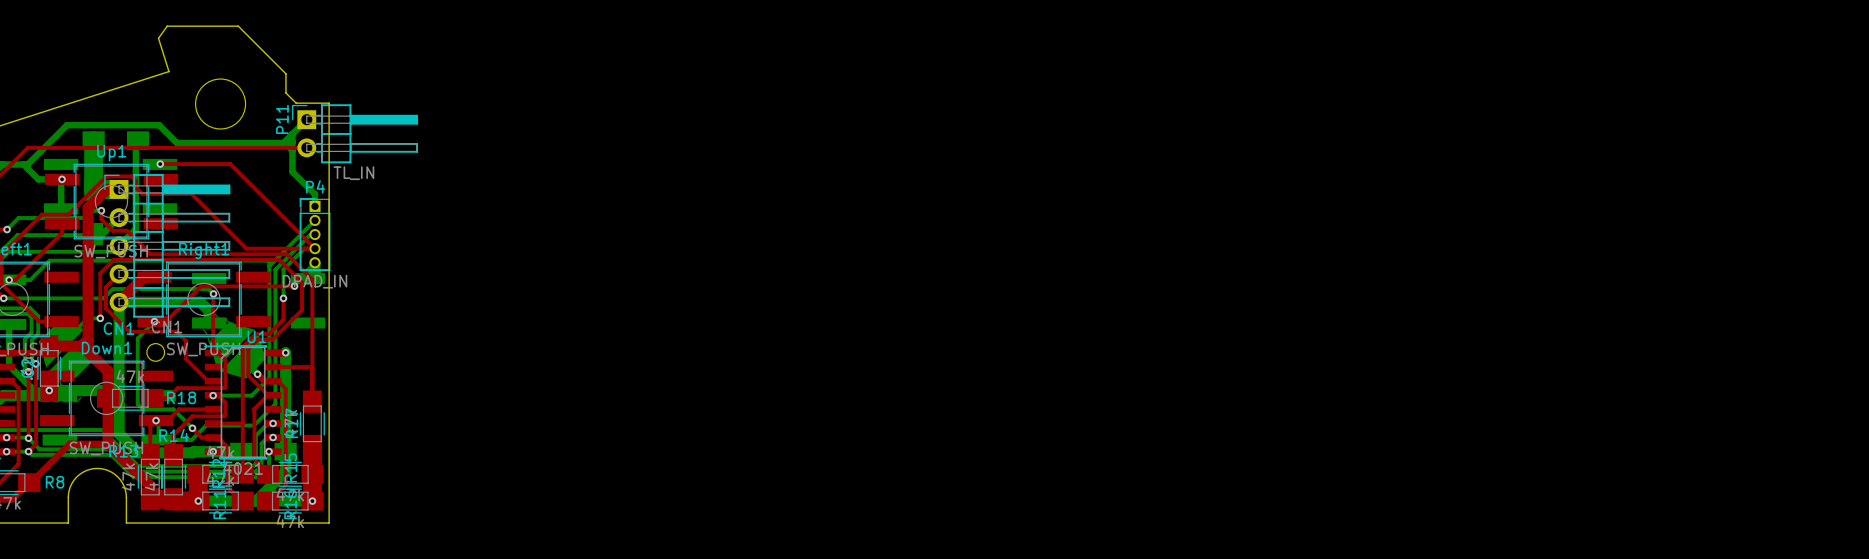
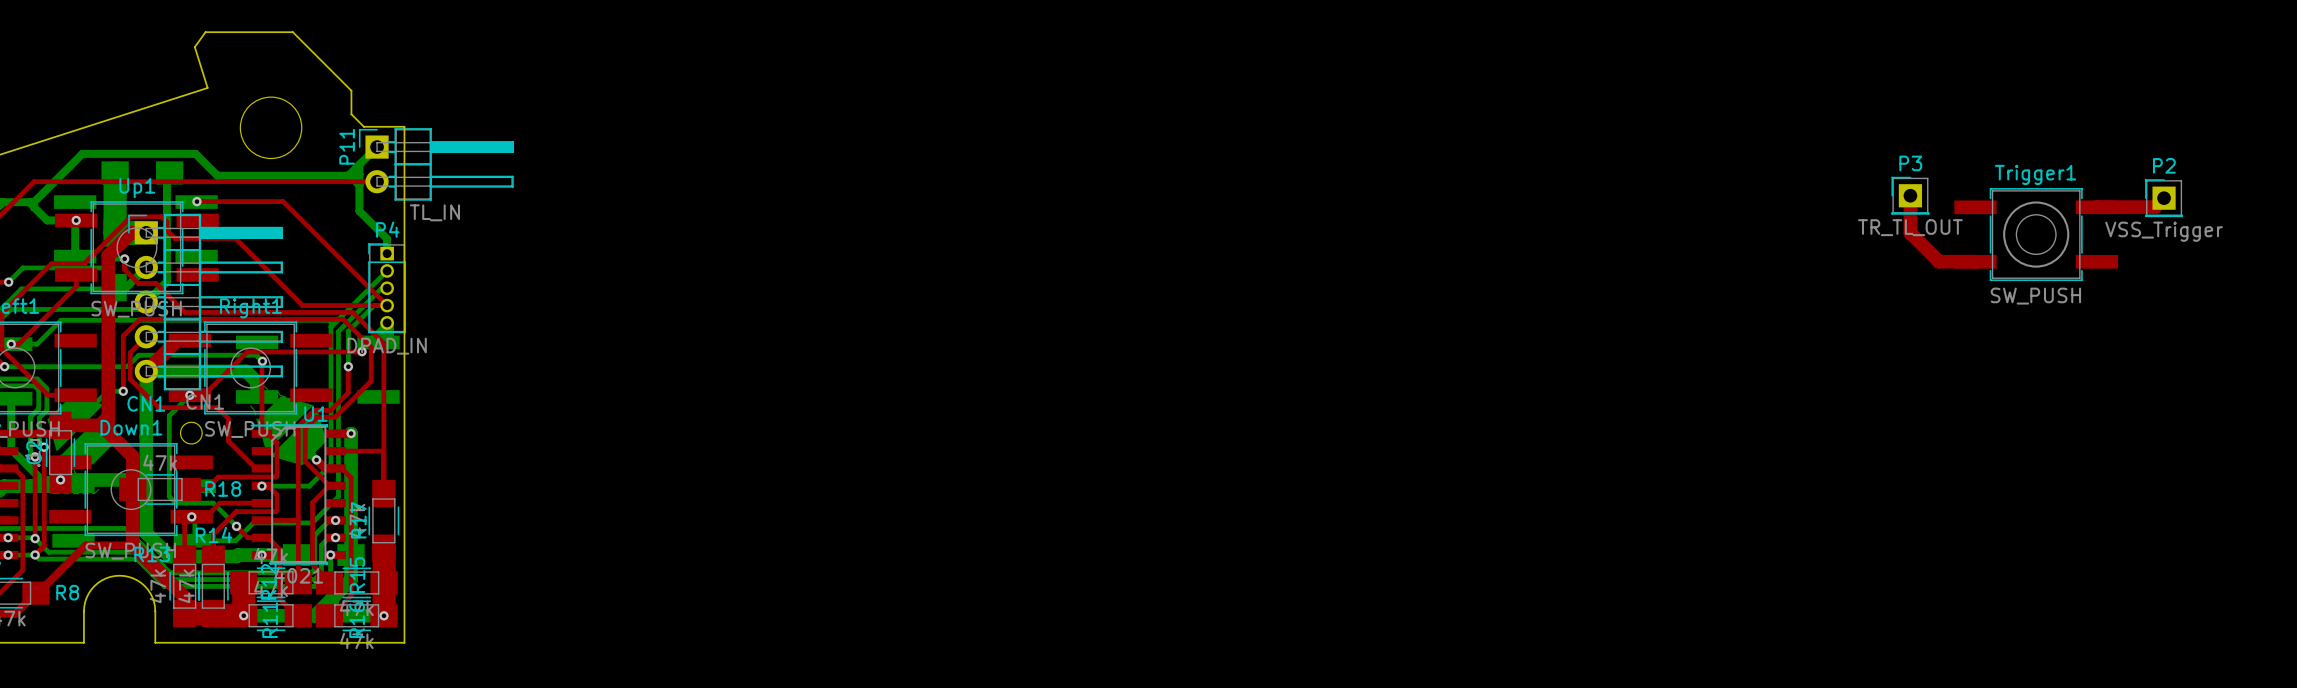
top track: none -> (1910, 195) (1910, 232) (1939, 261) (1975, 261)
P3: none -> TR_TL_OUT (1910, 195)
top track: none -> (2164, 198) (2155, 207) (2097, 207)
P2: none -> VSS_Trigger (2164, 198)
Trigger1: none -> SW_PUSH (2036, 234)

